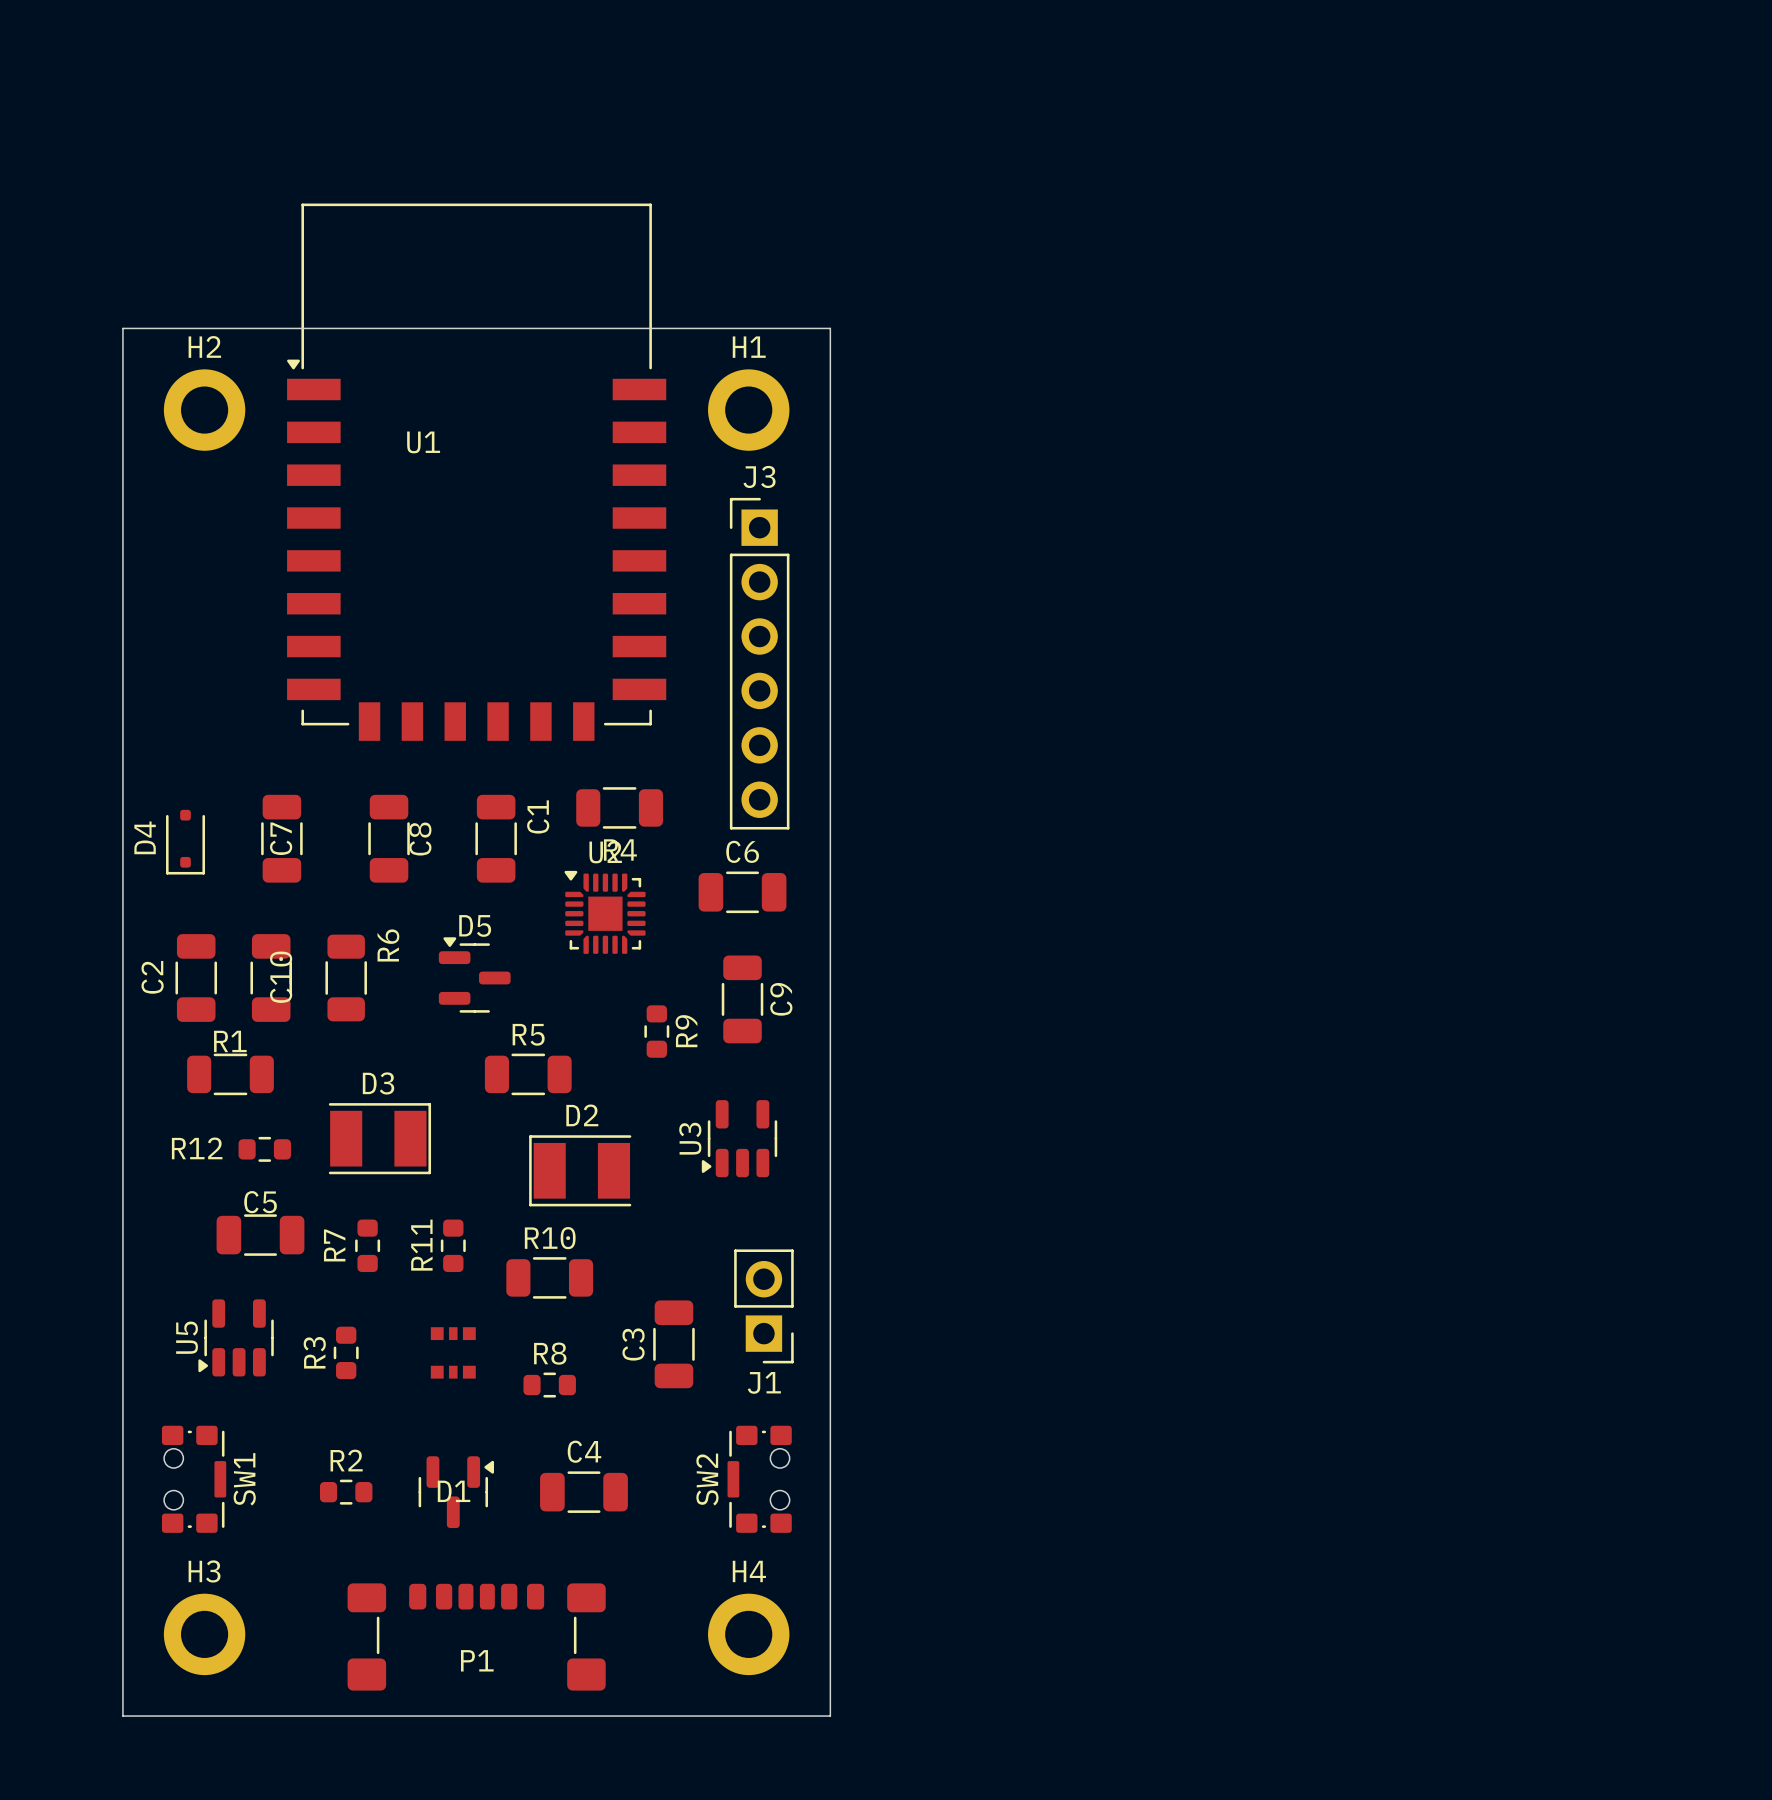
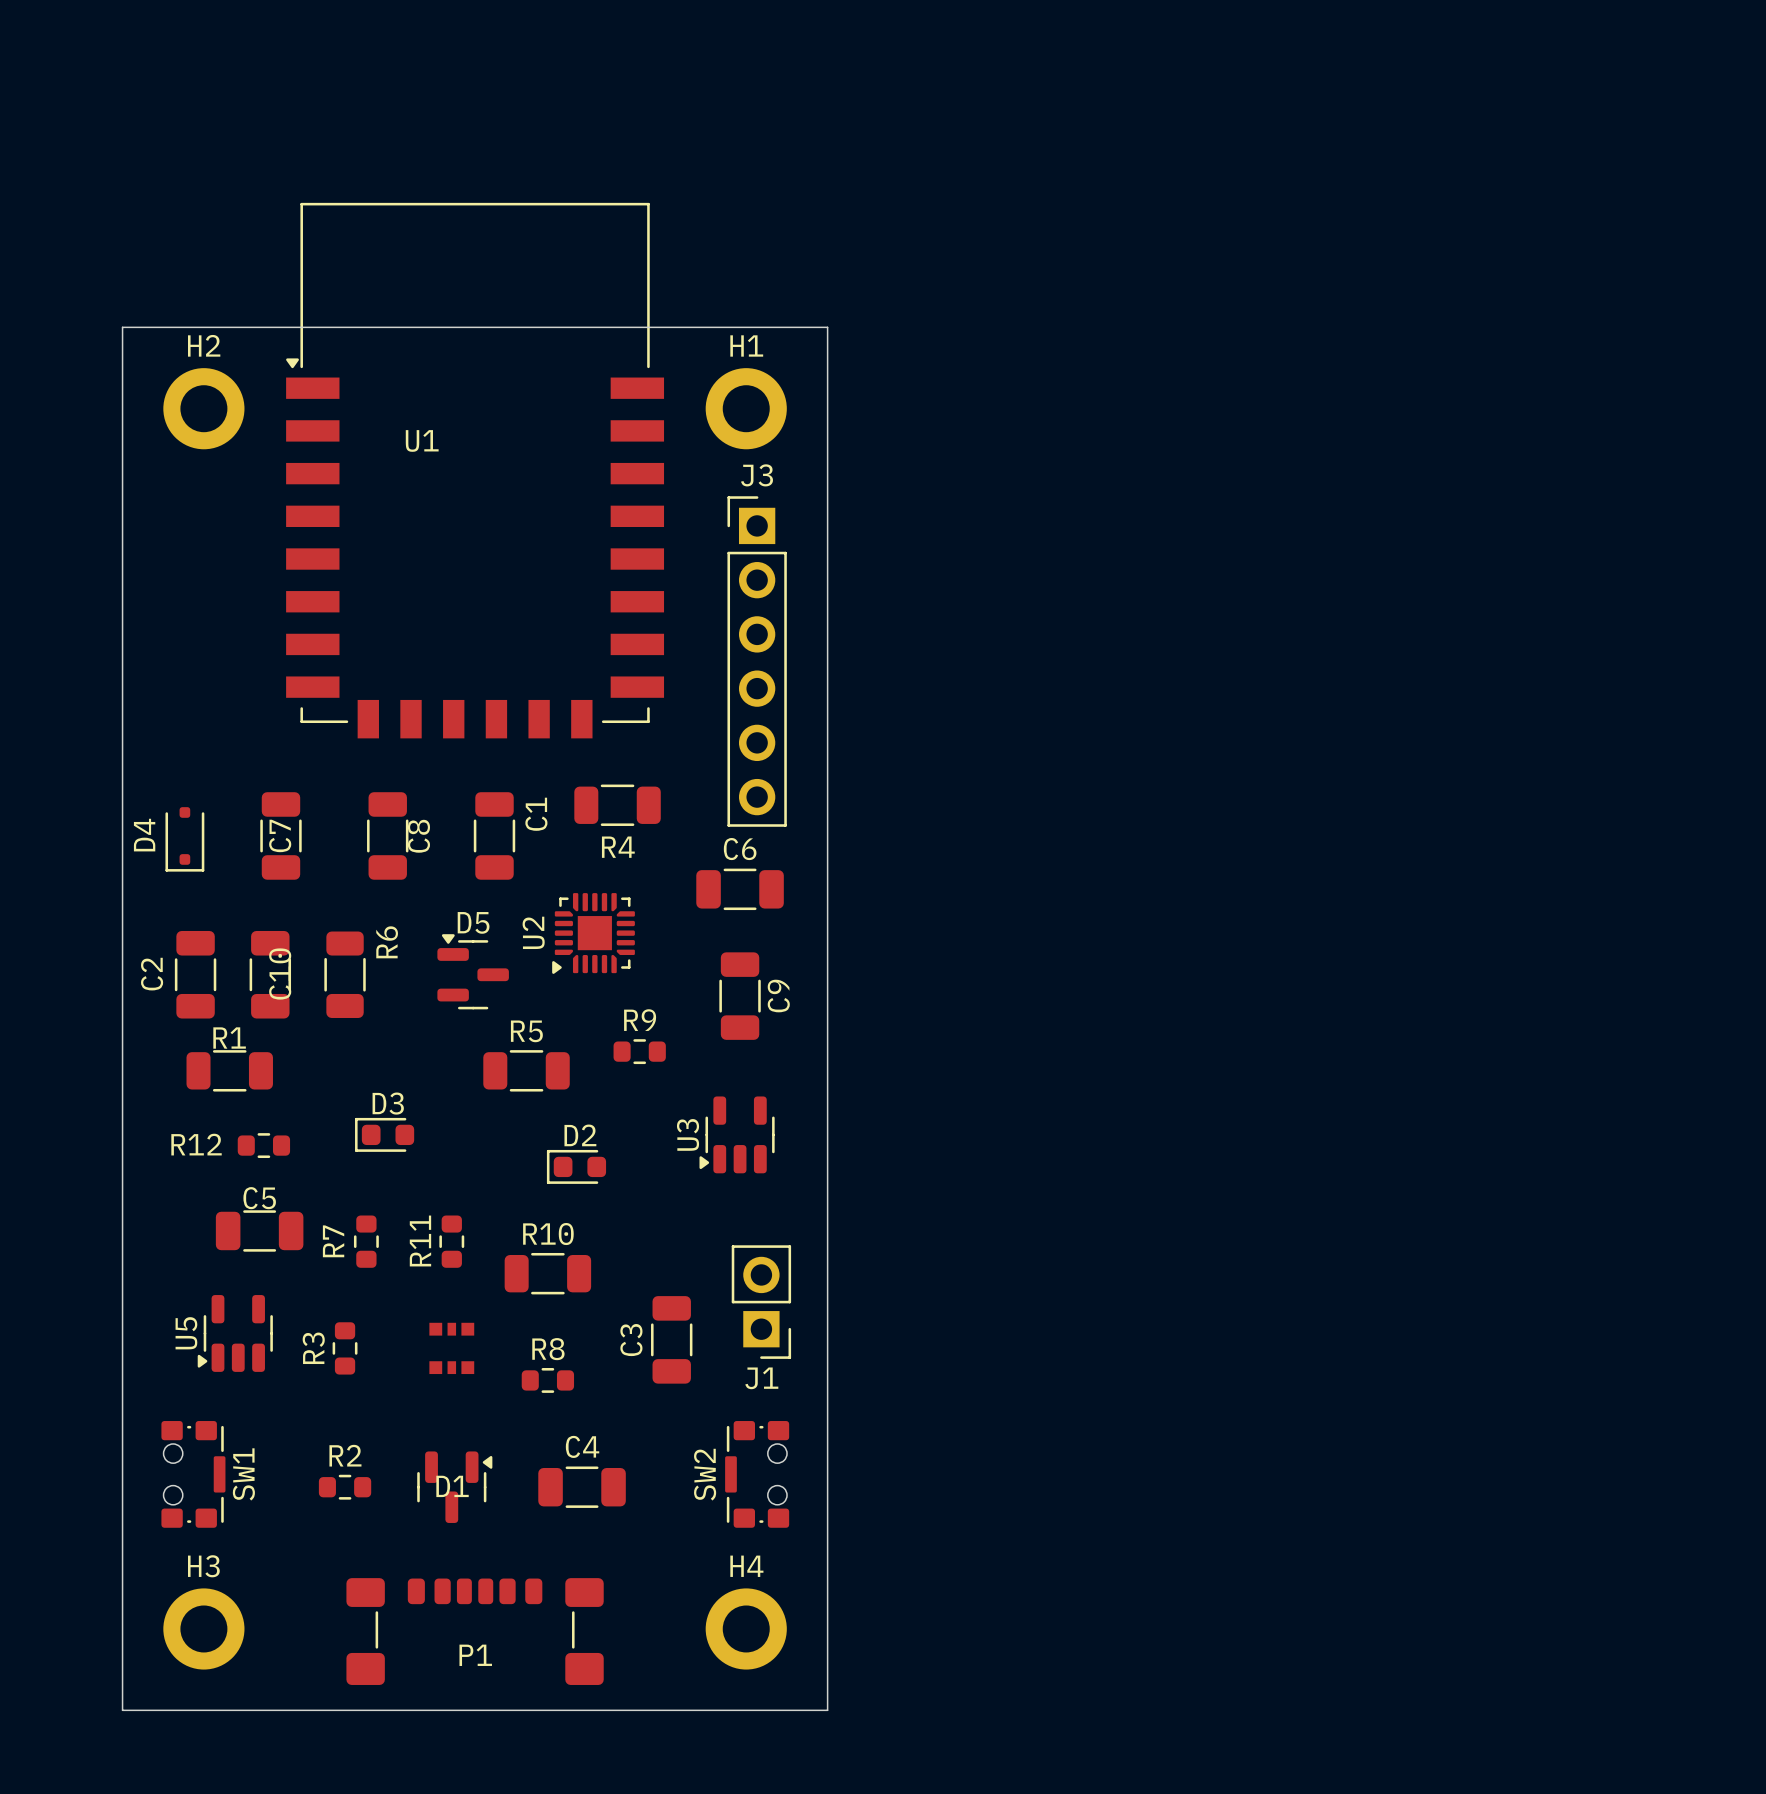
U2 rotation: 0° (605, 912) -> 90° counterclockwise (593, 933)
R9 rotation: 0° (656, 1031) -> 90° clockwise (639, 1051)
R9 name position: R9 (686, 1031) -> R9 (640, 1020)
D3 footprint: [328, 1103, 432, 1175] -> [355, 1117, 415, 1152]
D2 footprint: [529, 1135, 632, 1207] -> [546, 1149, 607, 1184]

